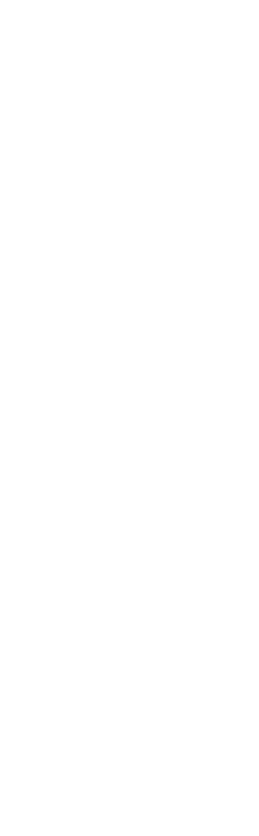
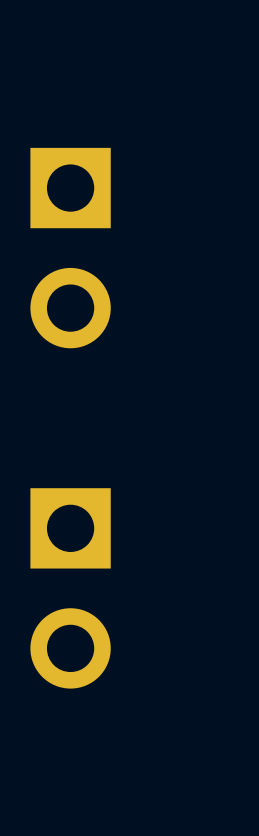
part: none -> (70, 248)
part: none -> (70, 588)

